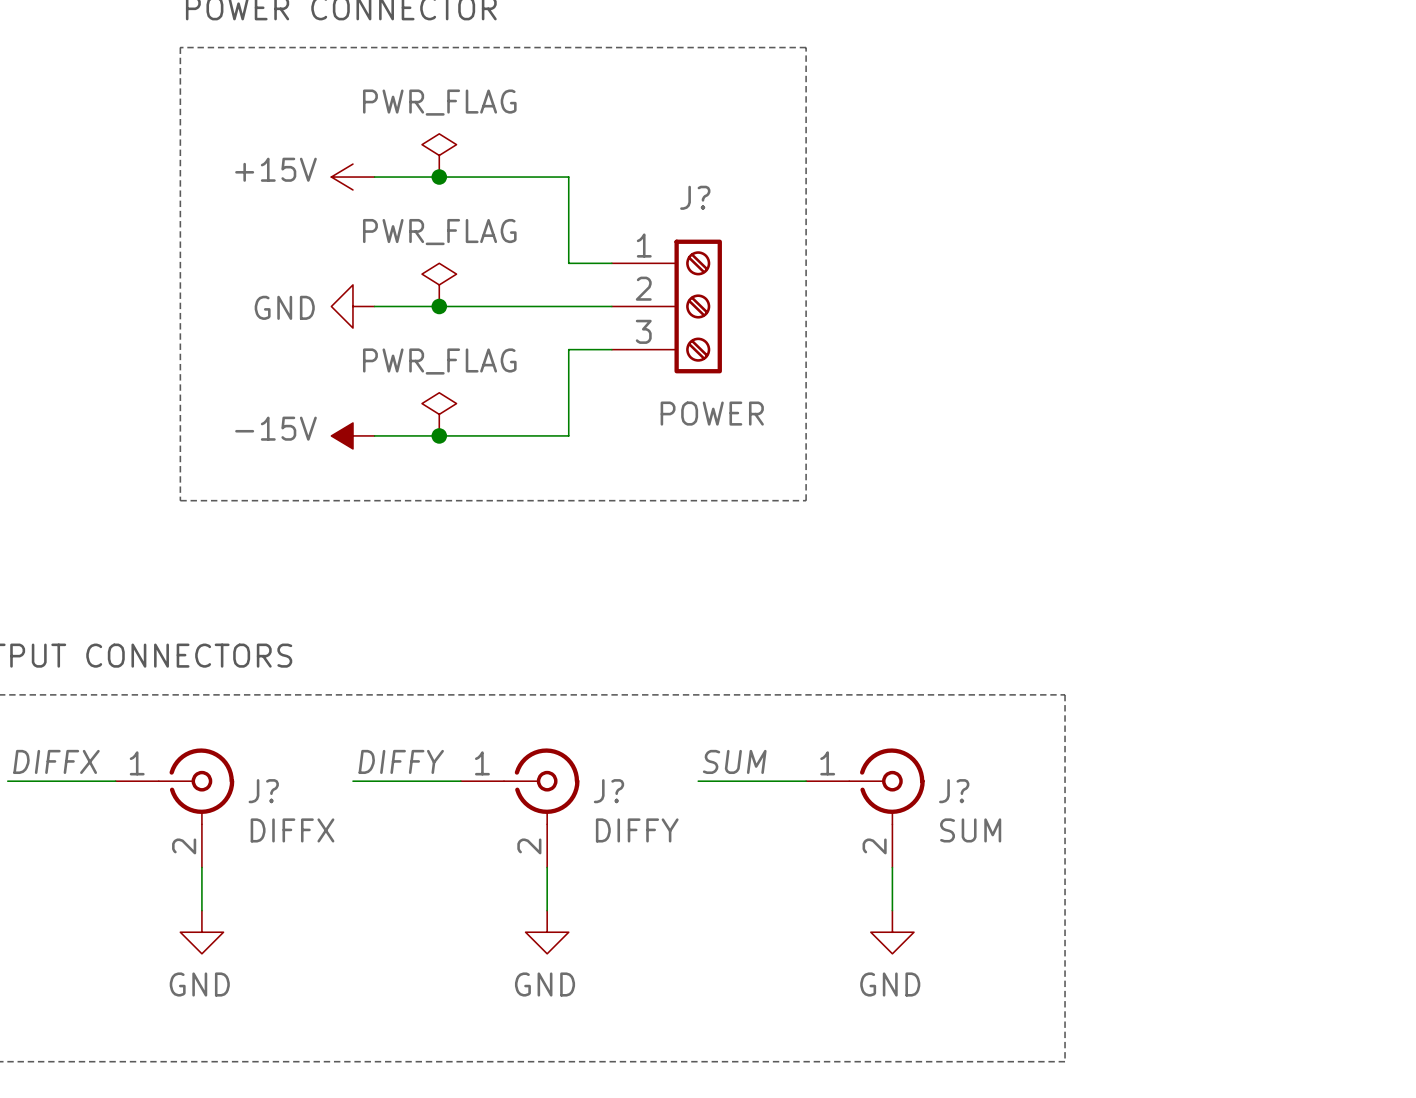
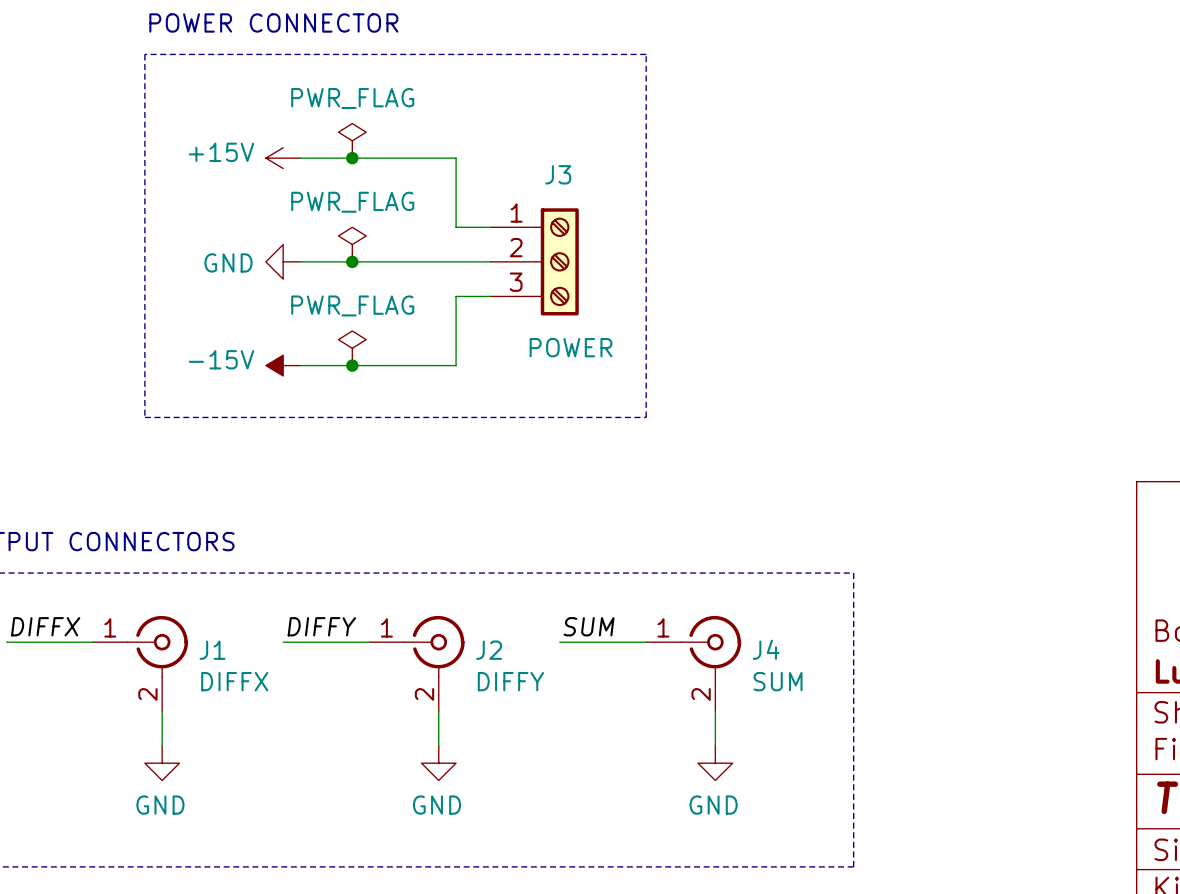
J? name: J? (695, 197) -> J3 (558, 174)
J? name: J? (263, 791) -> J1 (212, 650)
J? name: J? (608, 791) -> J2 (489, 650)
J? name: J? (954, 791) -> J4 (766, 649)

